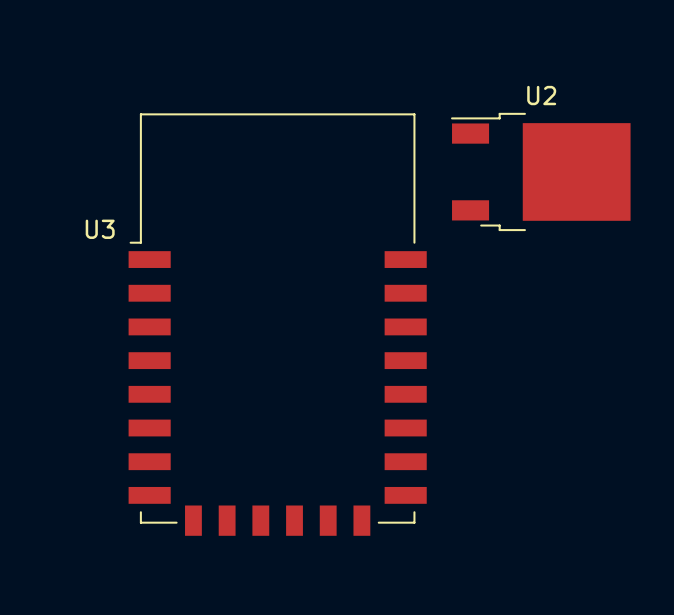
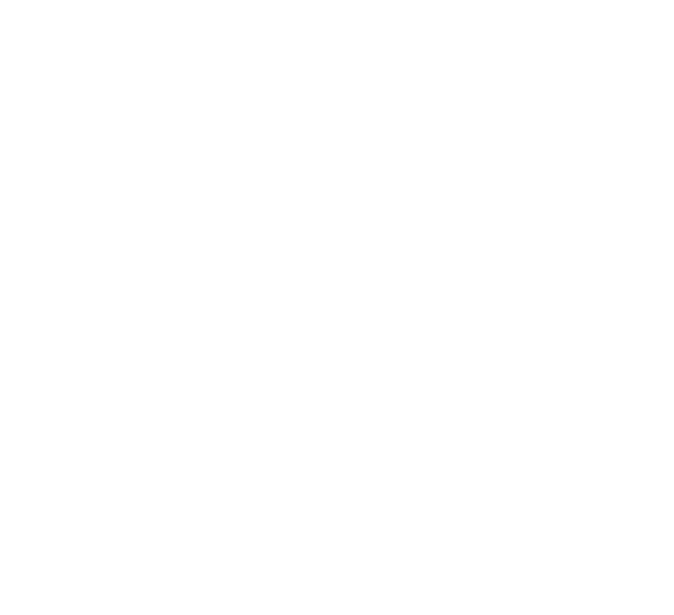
U2: (540, 171) -> none
U3: (277, 324) -> none

